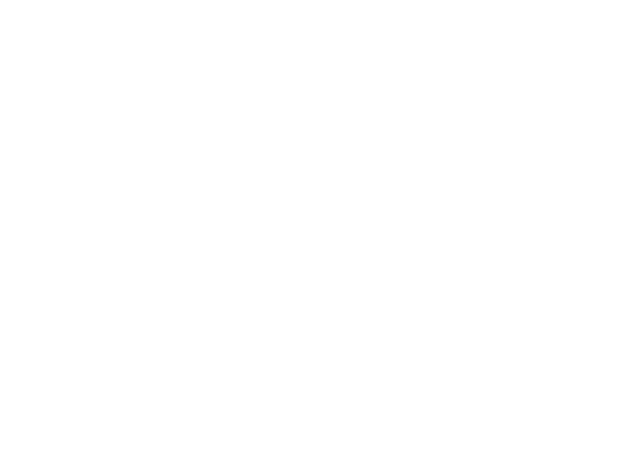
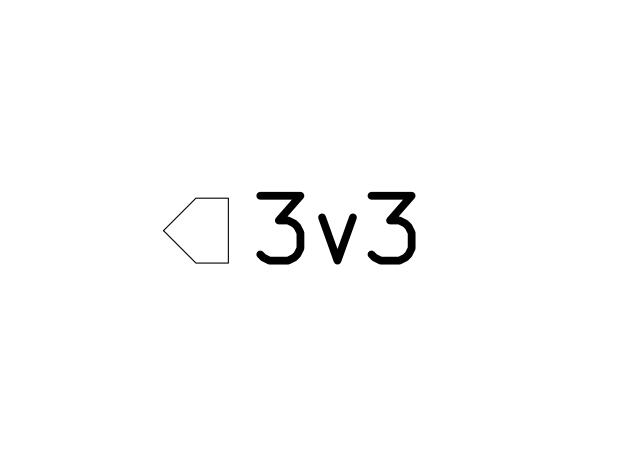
hierarchical label: none -> 3v3 (335, 228)

